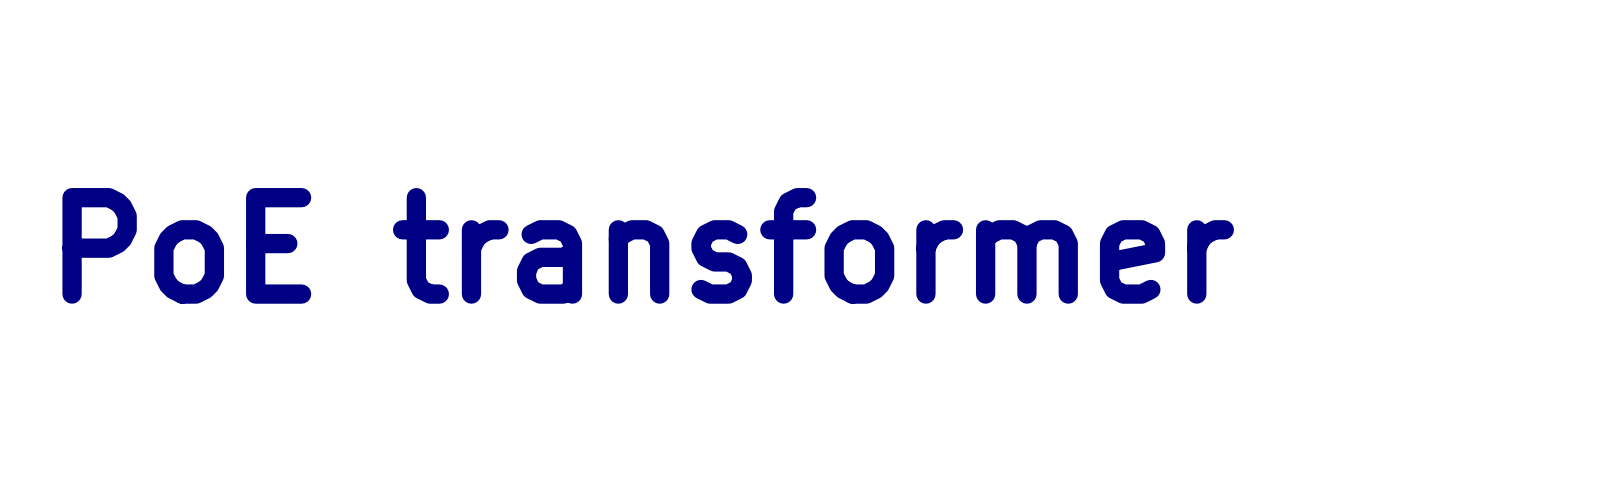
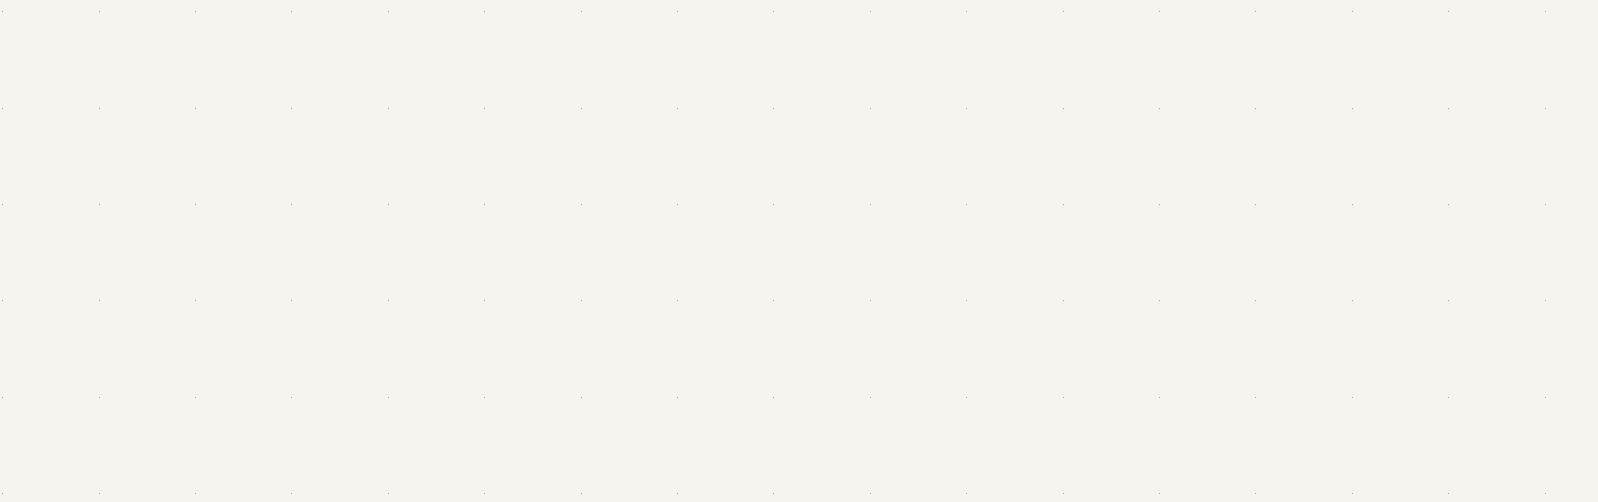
text: PoE transformer (648, 245) -> none

